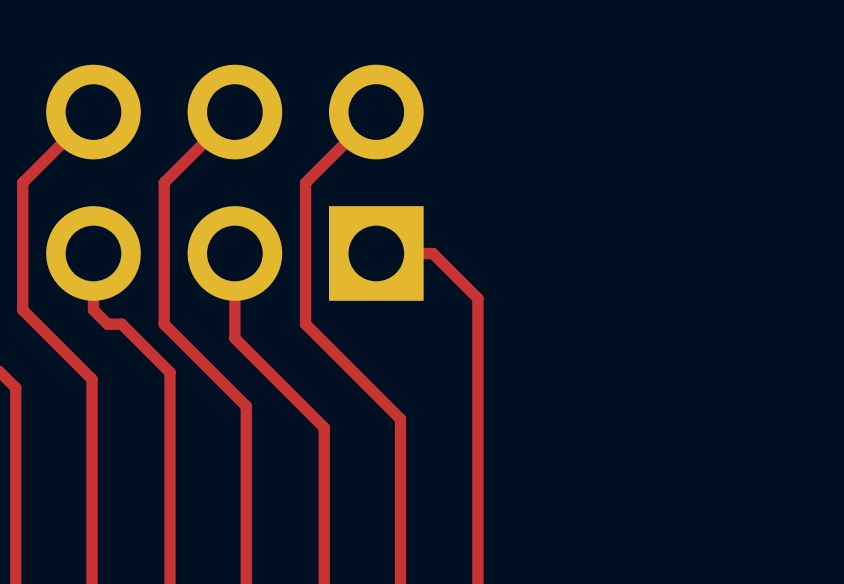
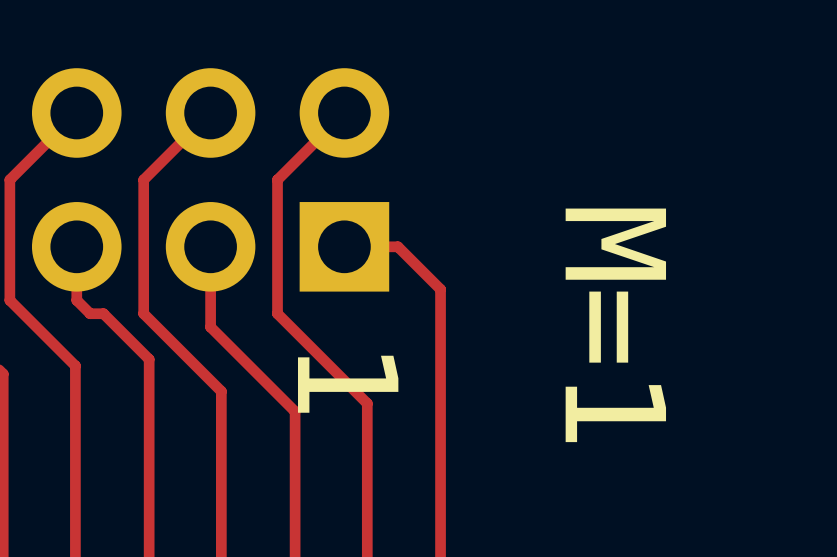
text: none -> M=1 (615, 325)
text: none -> 1 (348, 384)

